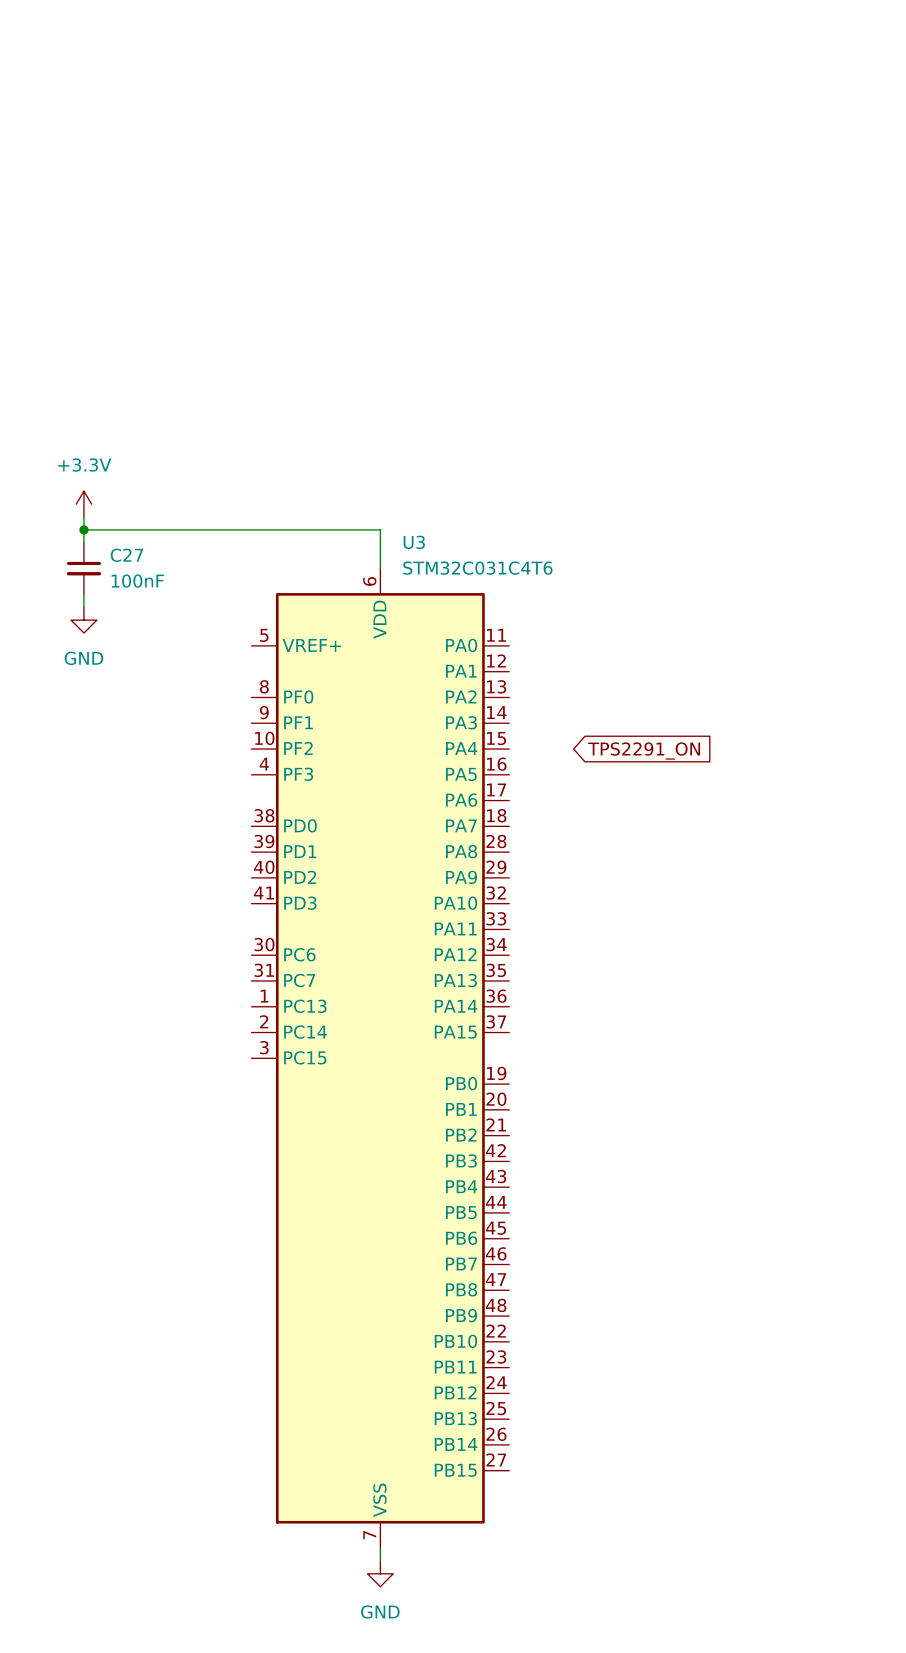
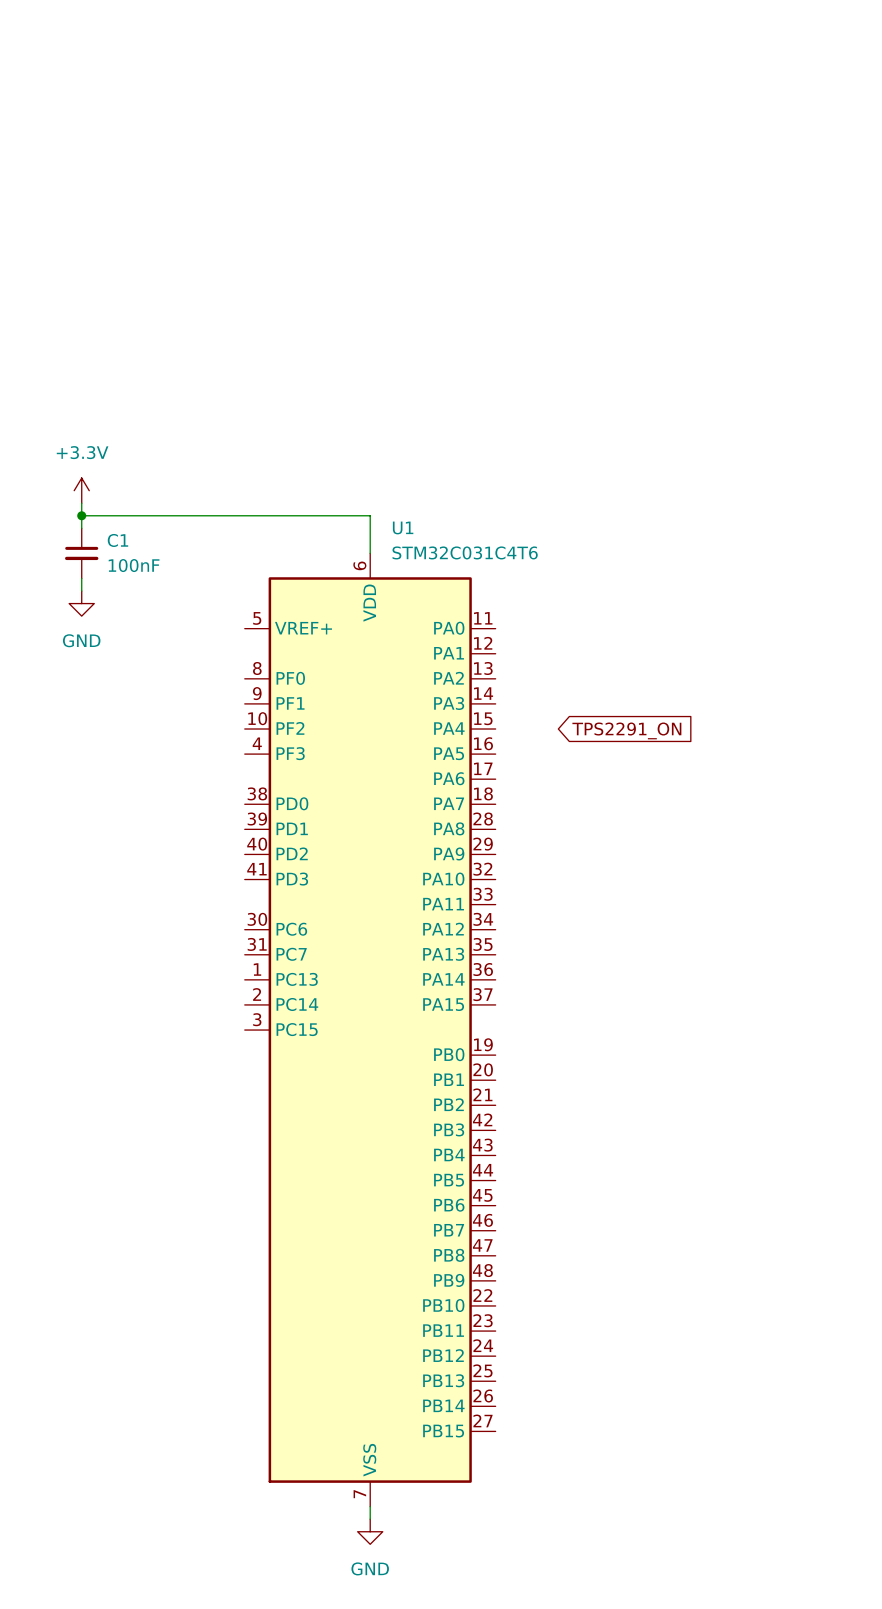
U3 name: U3 (414, 542) -> U1 (403, 527)
C27 name: C27 (126, 555) -> C1 (117, 540)

